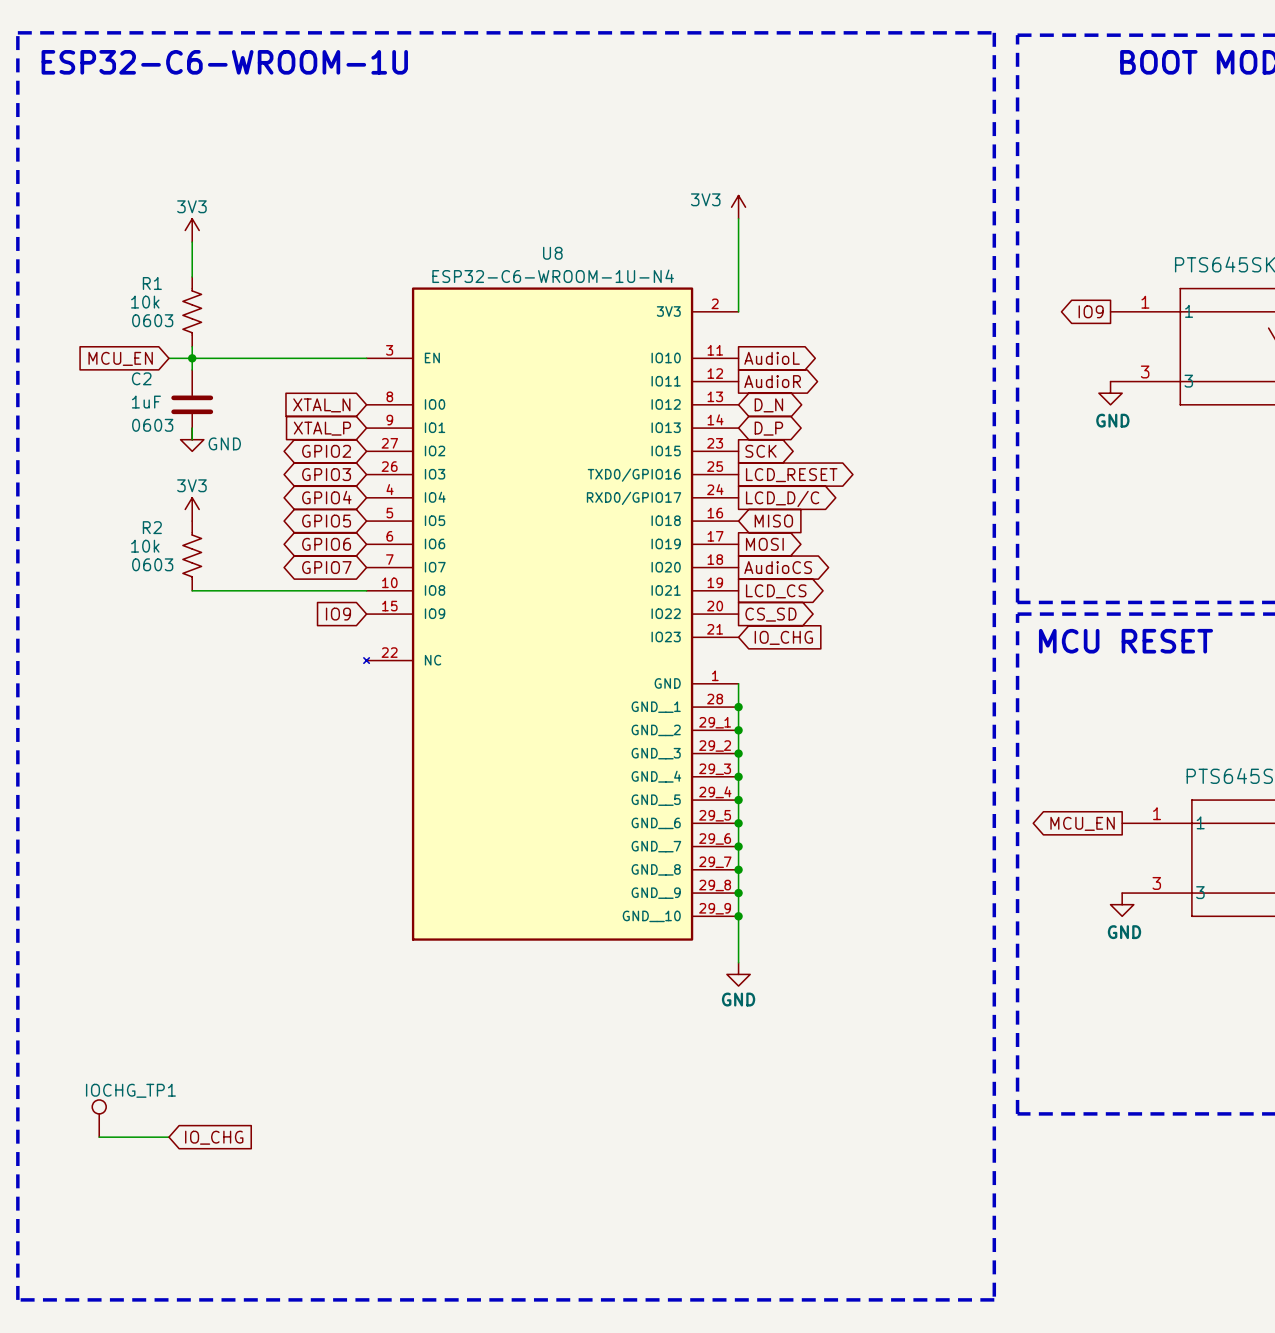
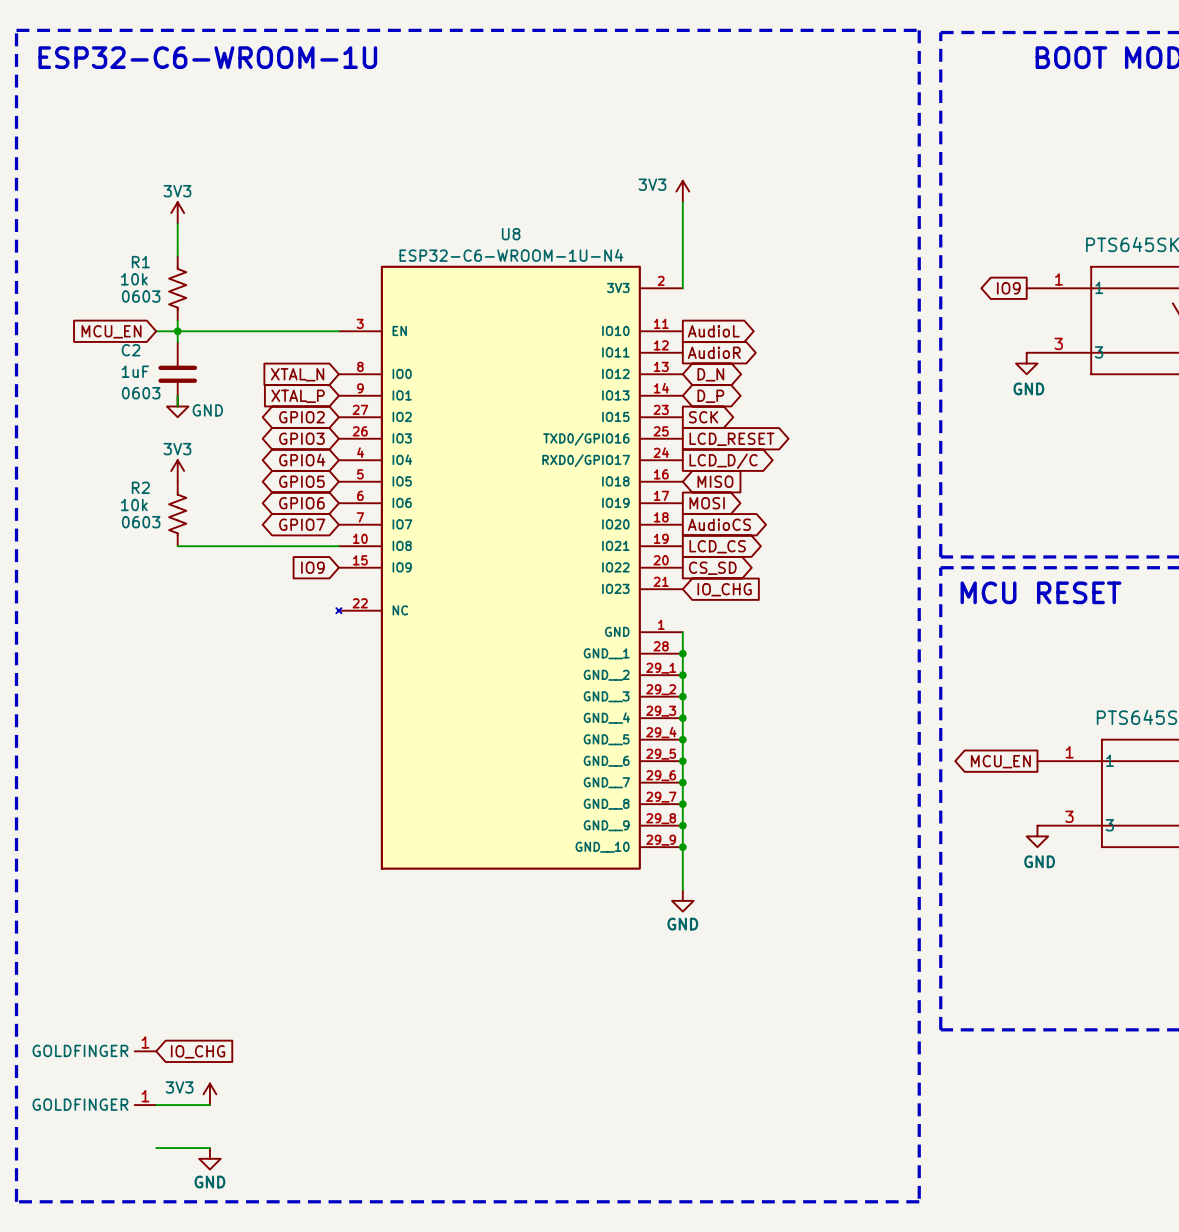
IOCHG_TP1: (99, 1118) -> none
part: none -> (145, 1051)
power symbol: none -> 3V3 (209, 1094)
part: none -> (145, 1105)
wire: none -> (156, 1105) (209, 1105)
wire: none -> (156, 1148) (209, 1148)
power symbol: none -> GND (209, 1158)

